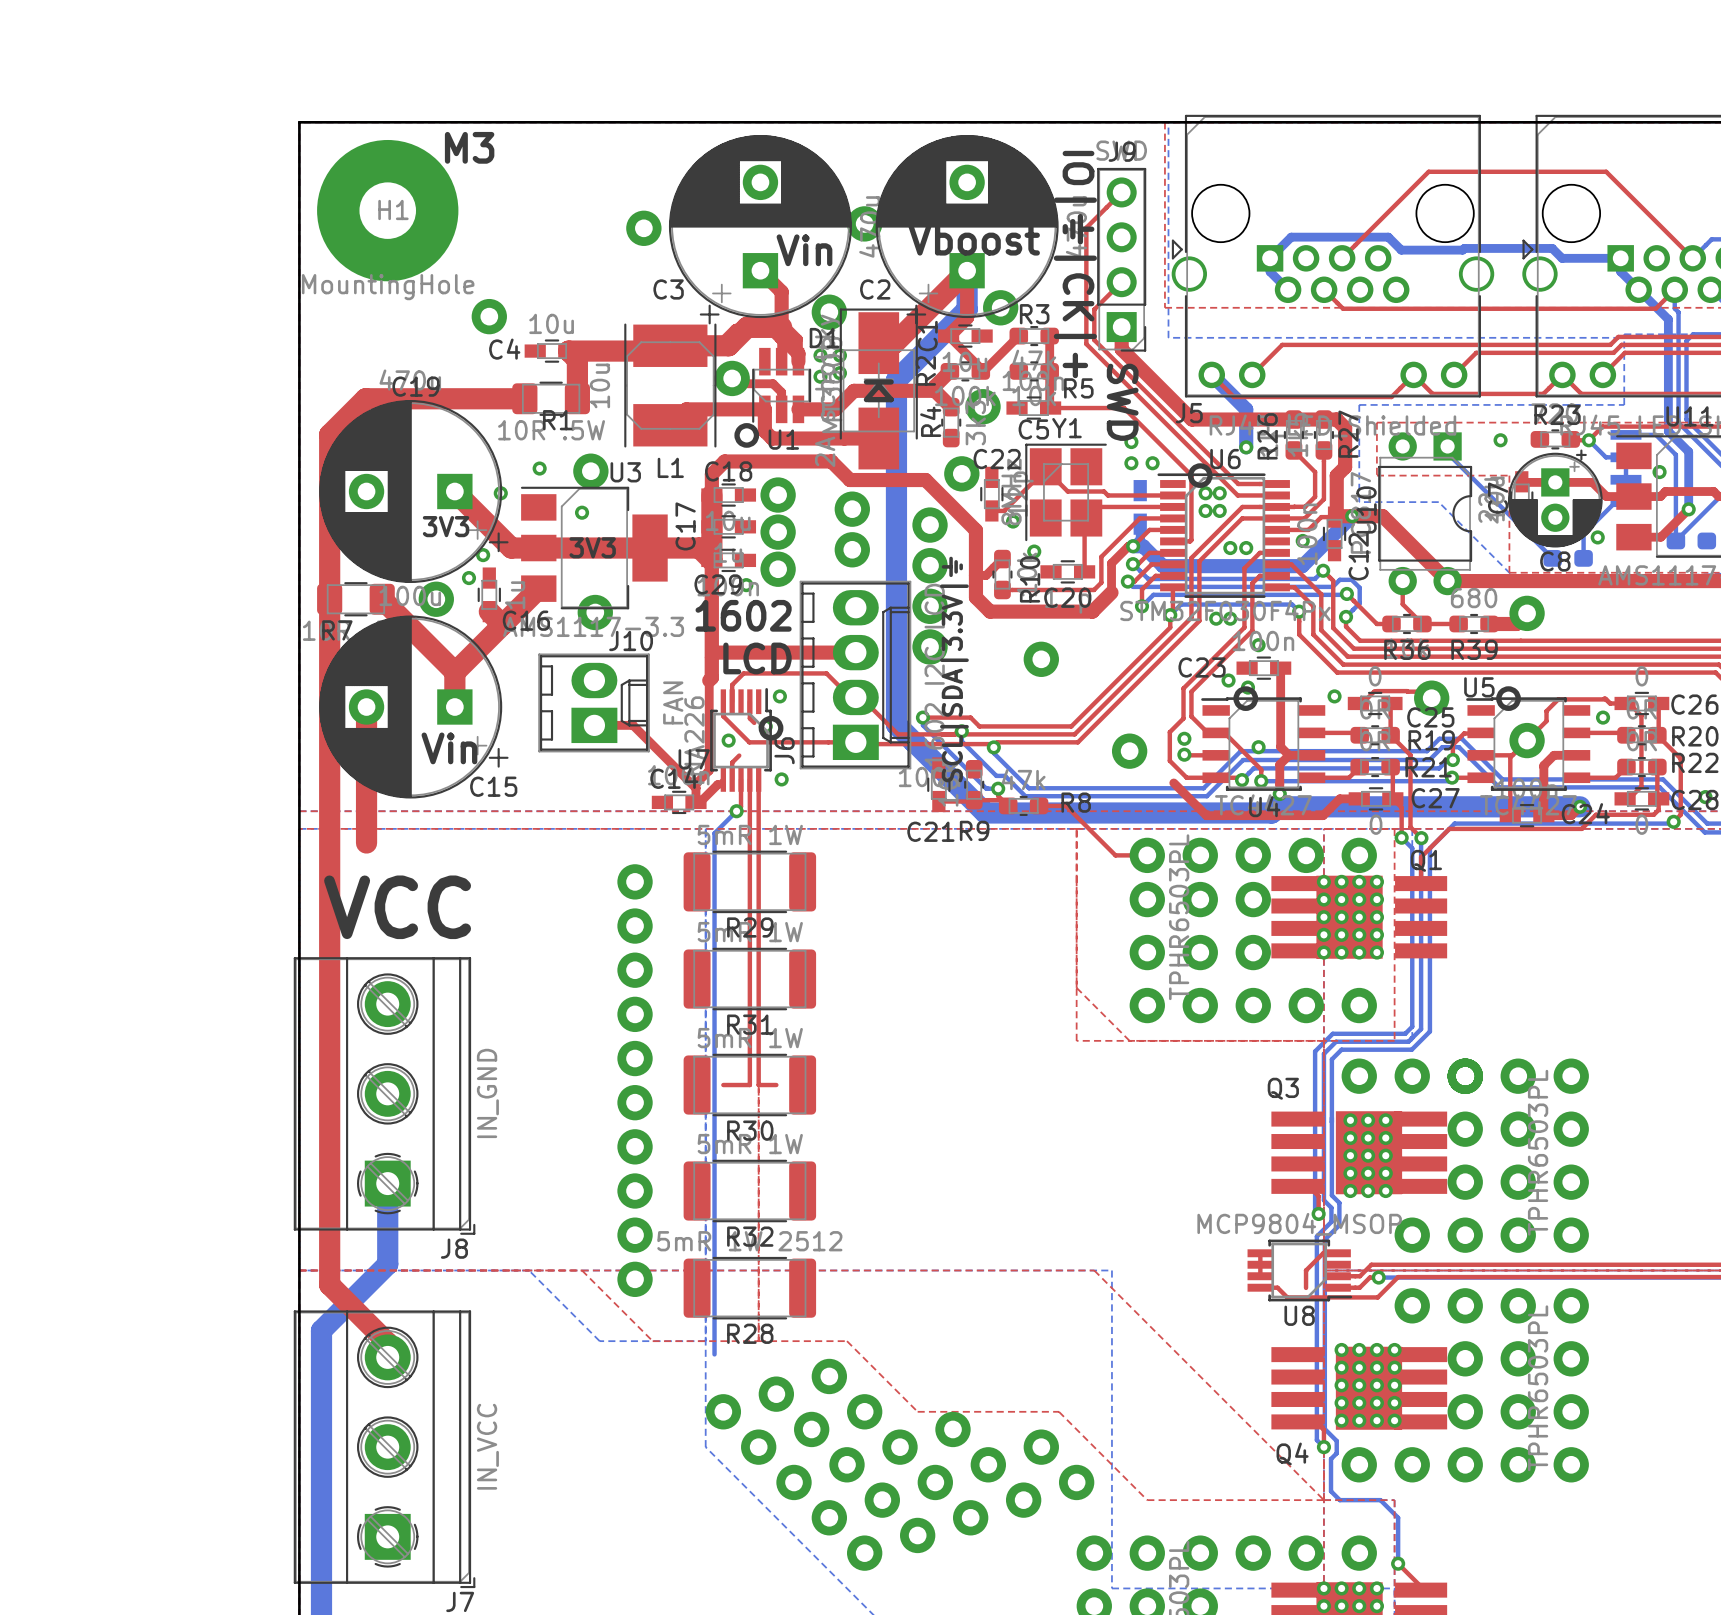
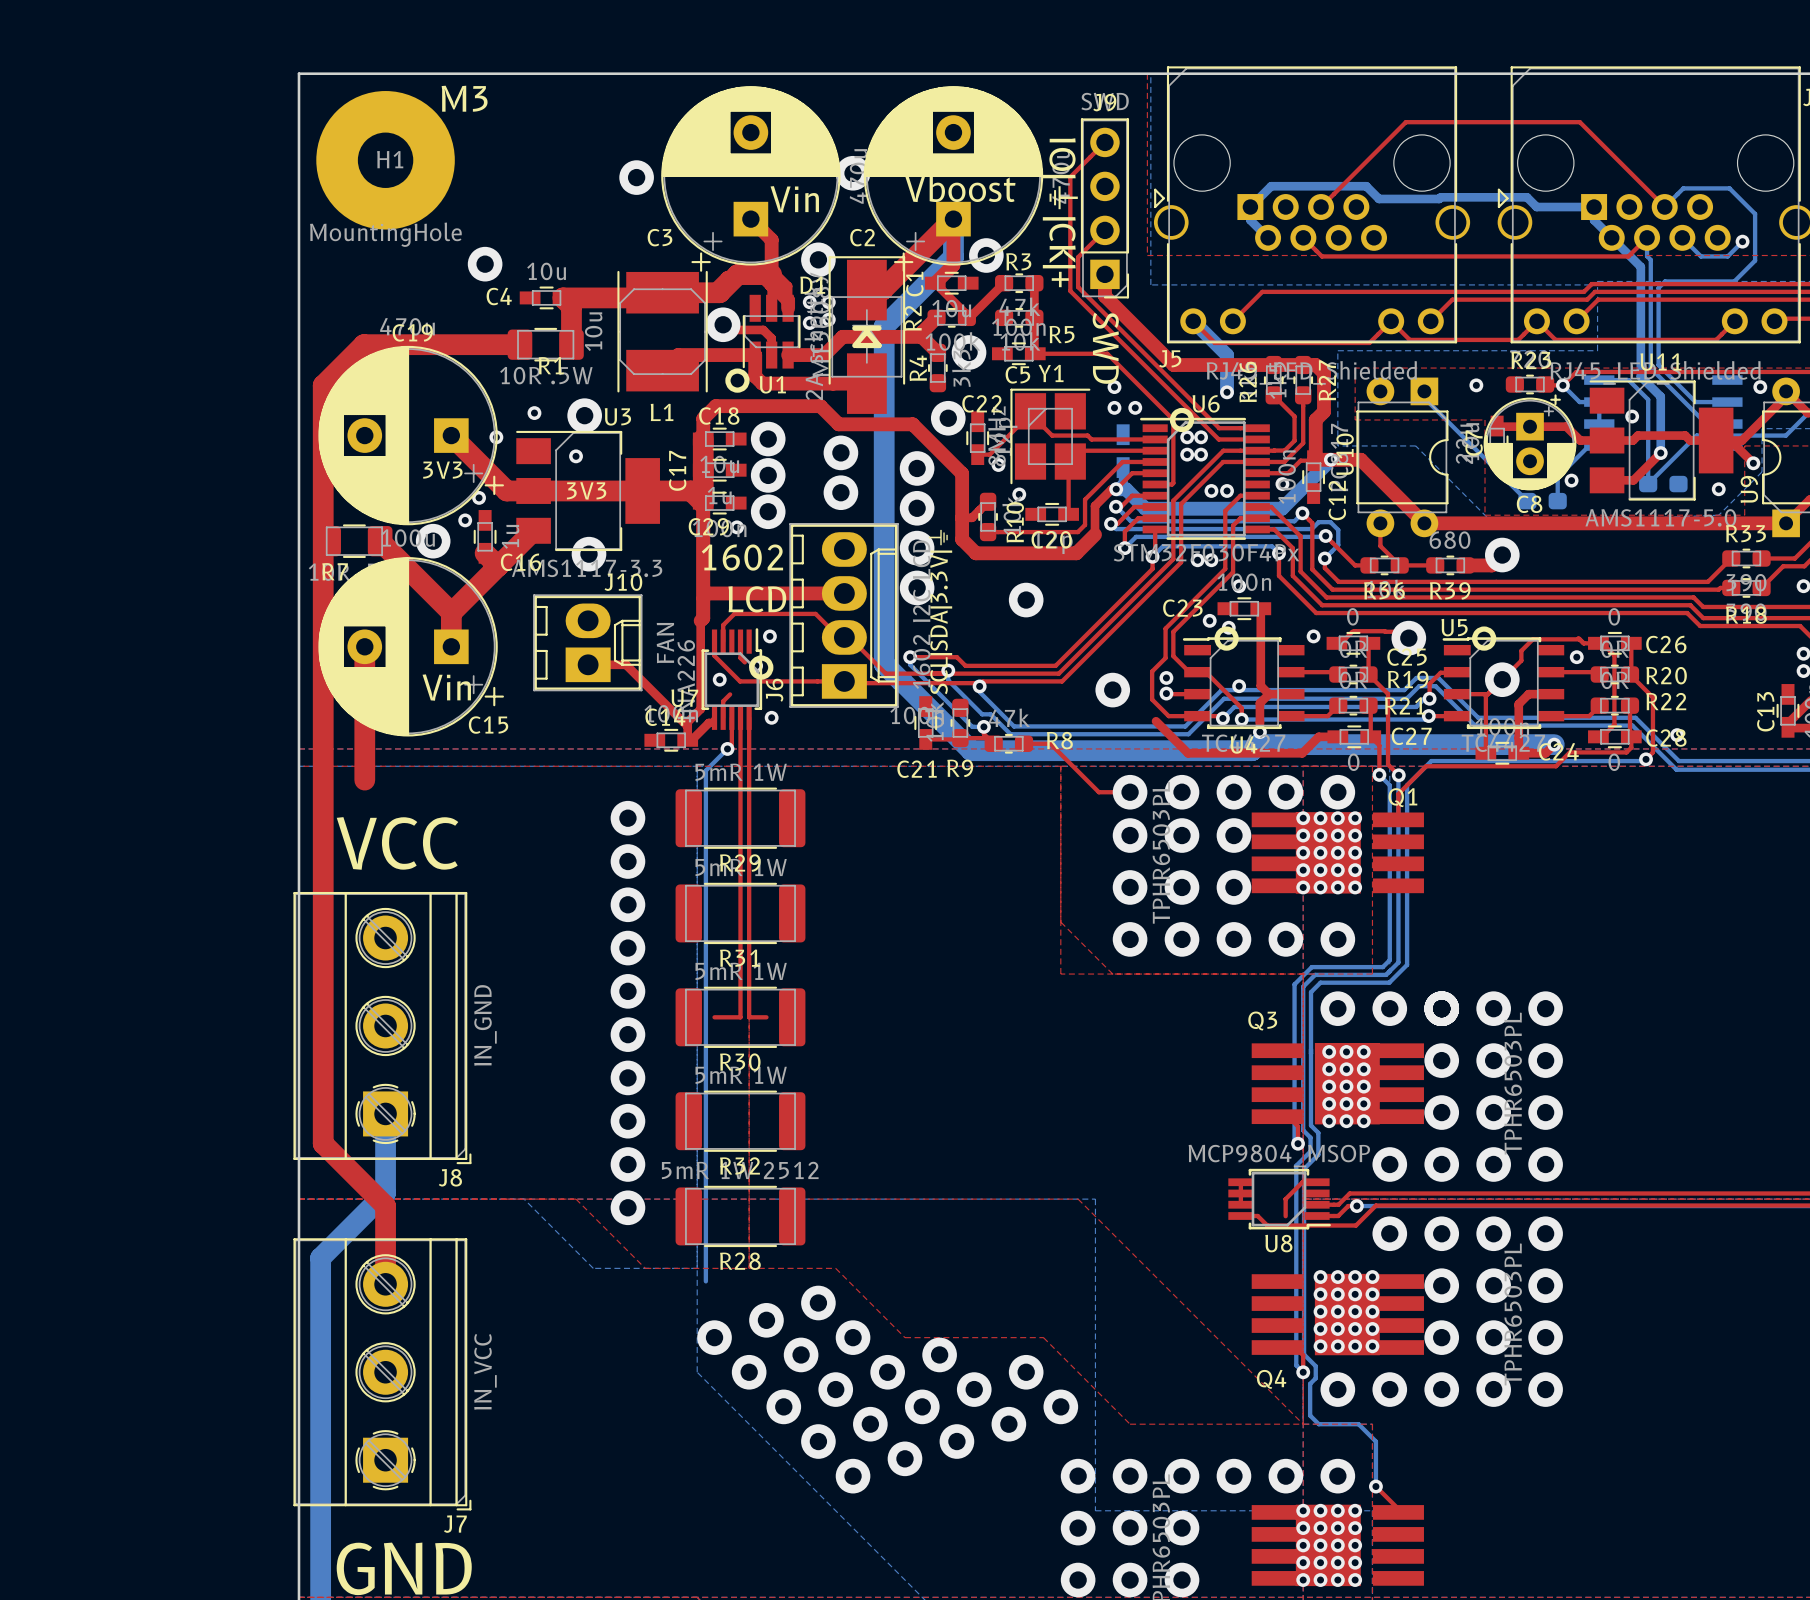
top track: (329, 434) (329, 1284) (387, 1342) -> (328, 379) (323, 385) (323, 1143) (385, 1206) (385, 1270)

